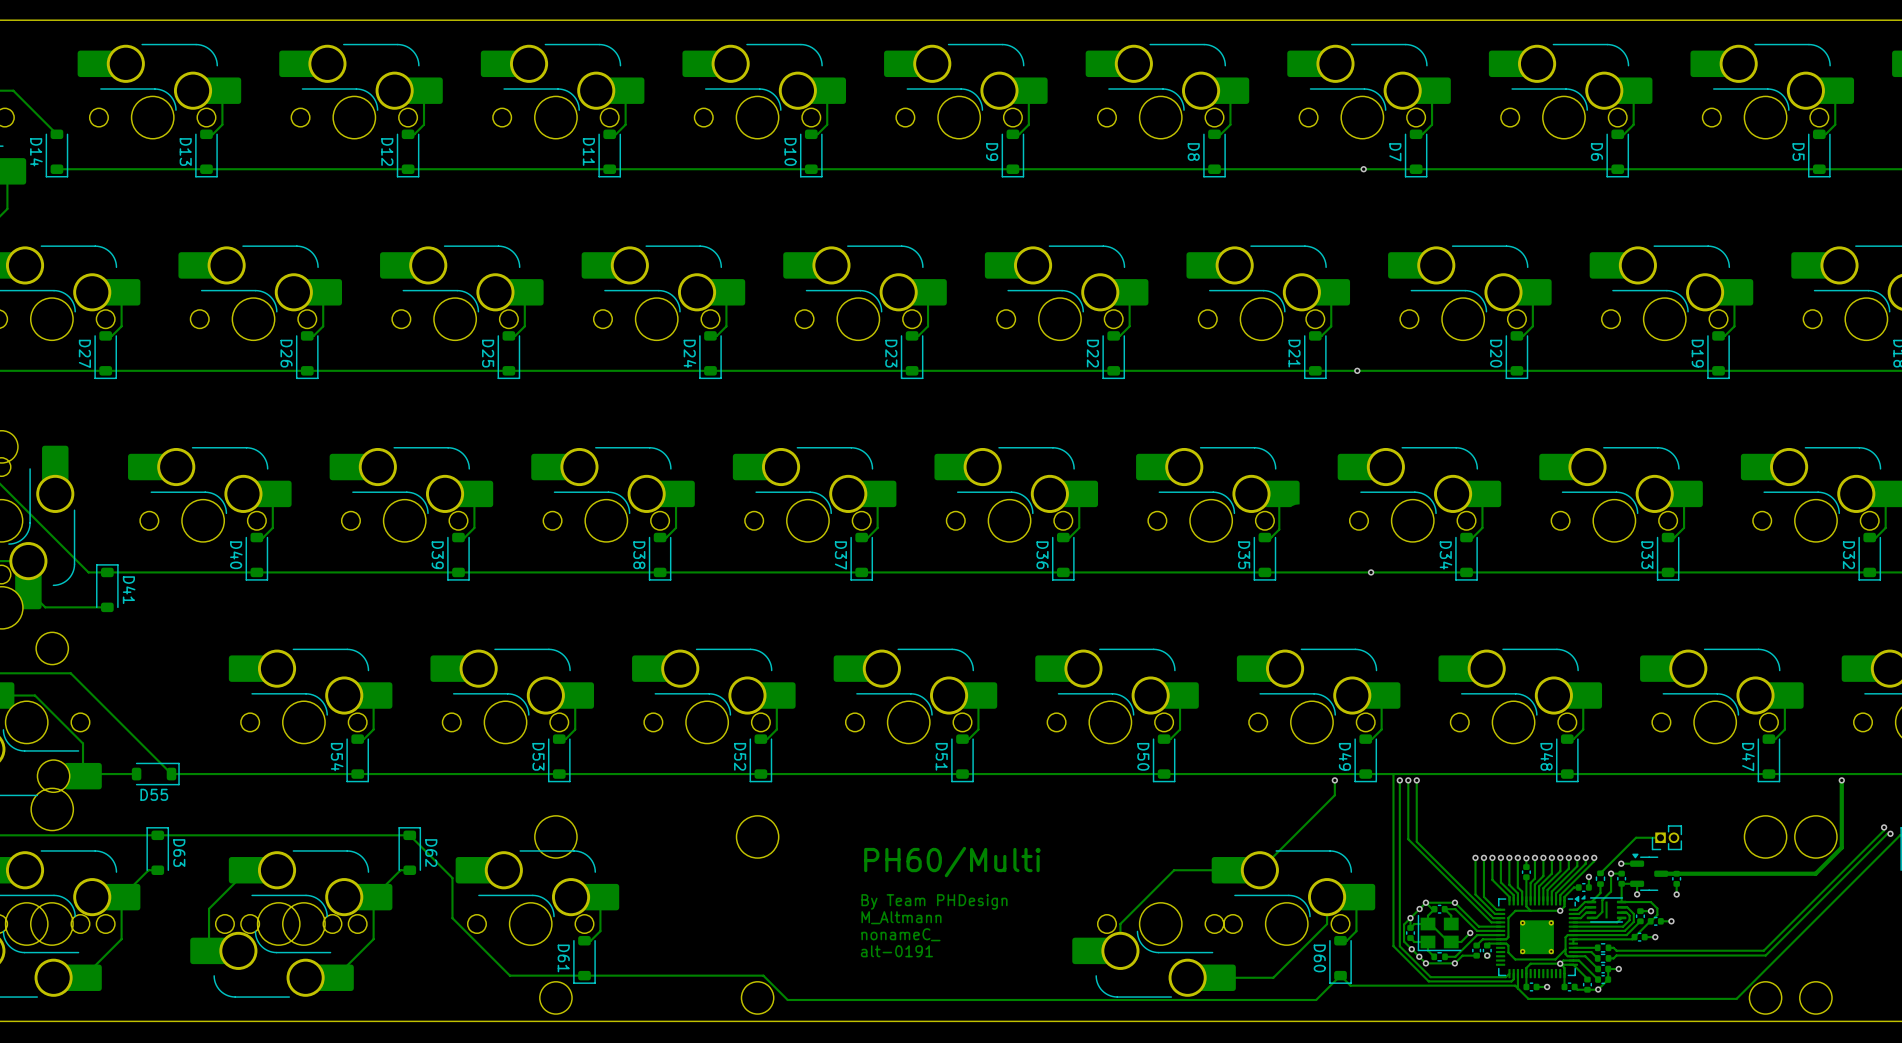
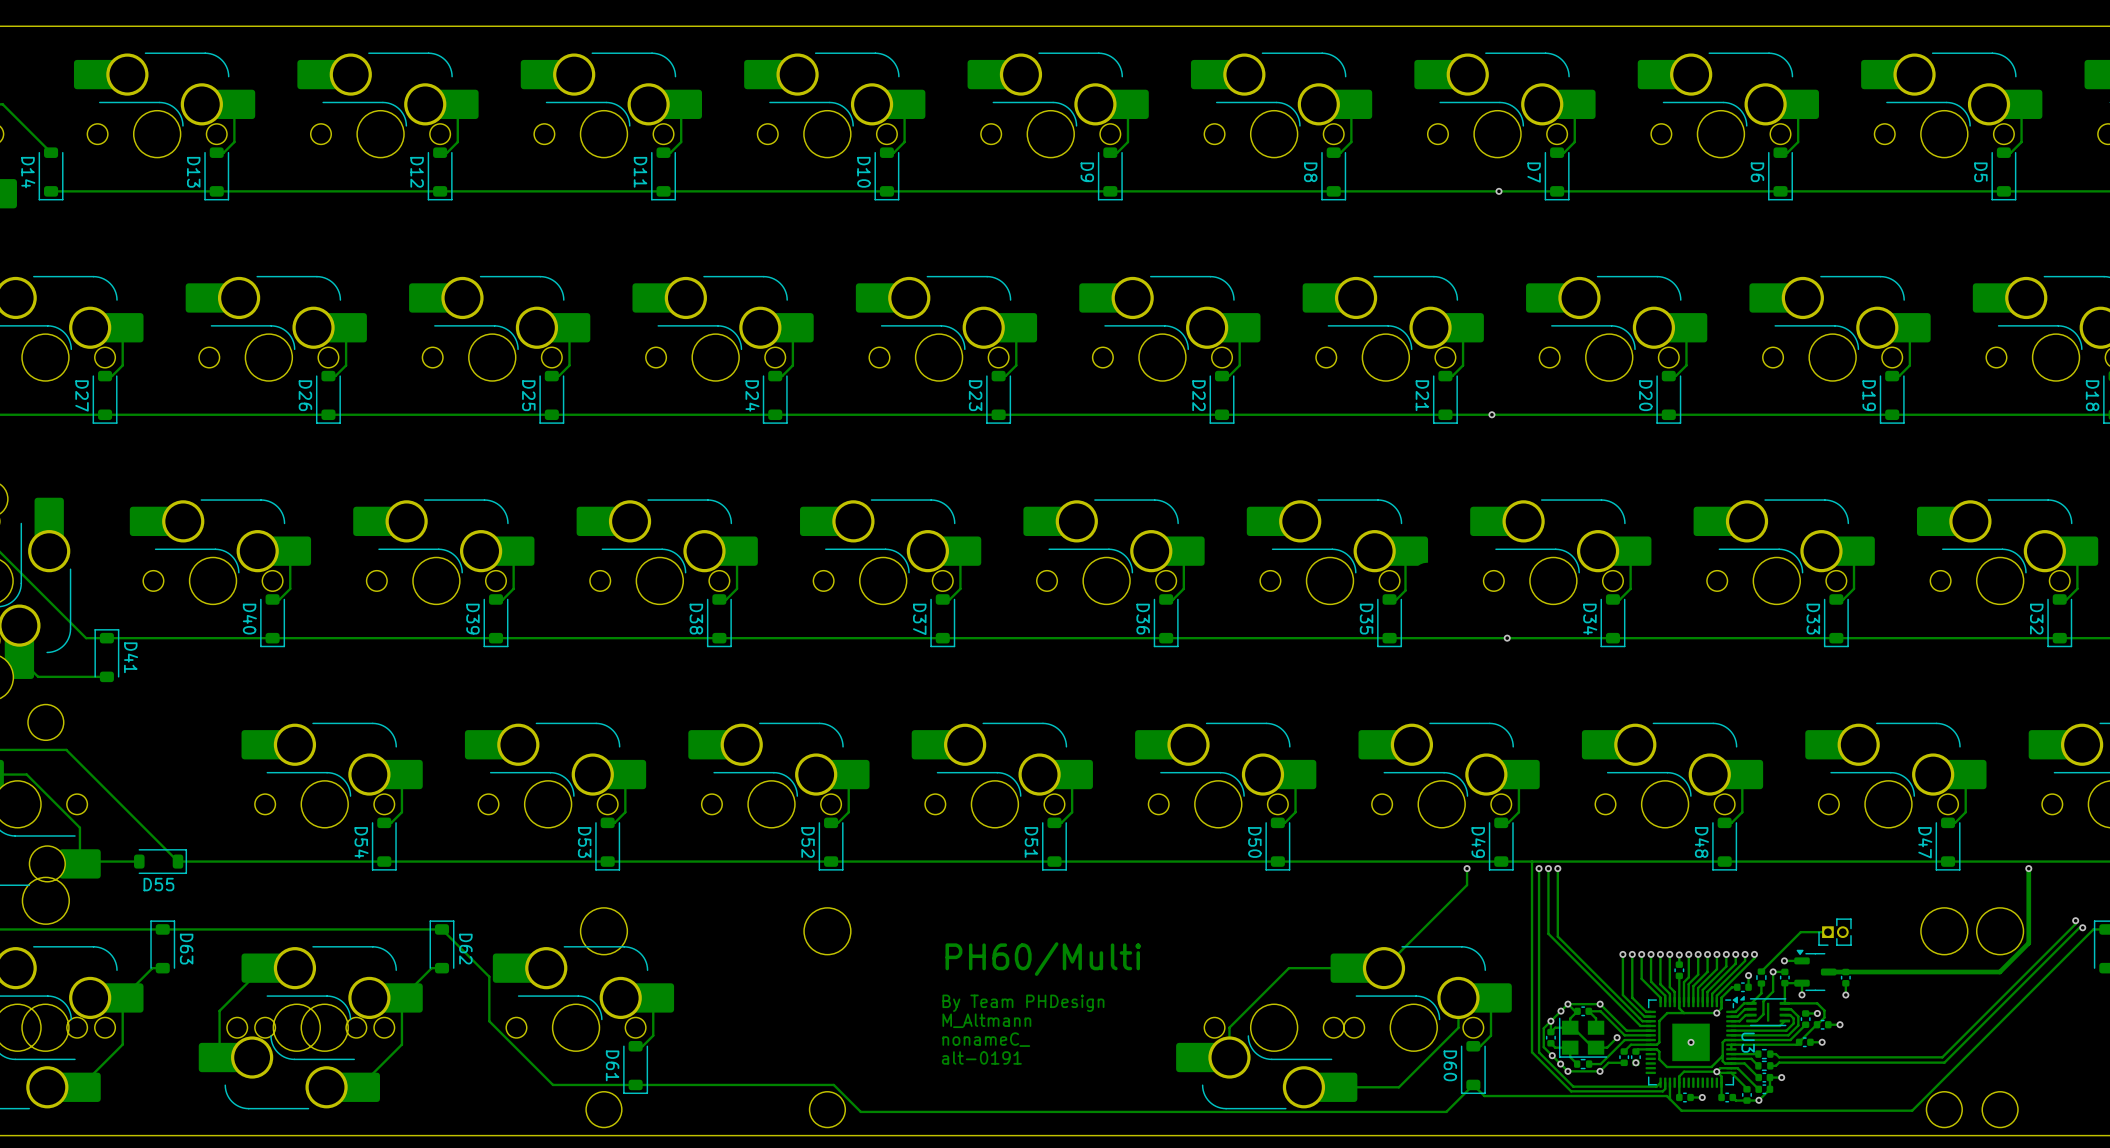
via: none -> (1691, 1042)
part: (1537, 937) -> none
U3: none -> (1691, 1042)

